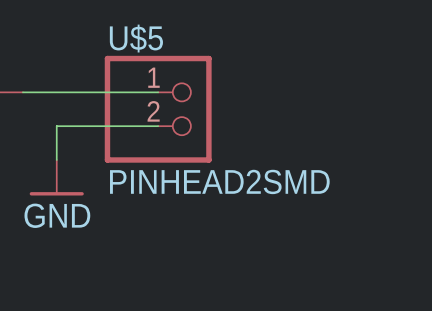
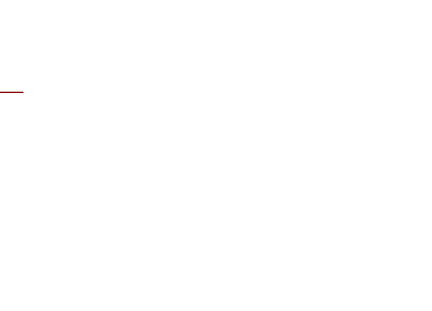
wire: (22, 92) (158, 92) -> none
U$5: PINHEAD2SMD (158, 109) -> none
wire: (158, 126) (56, 126) (56, 159) -> none
power symbol: GND (56, 177) -> none

